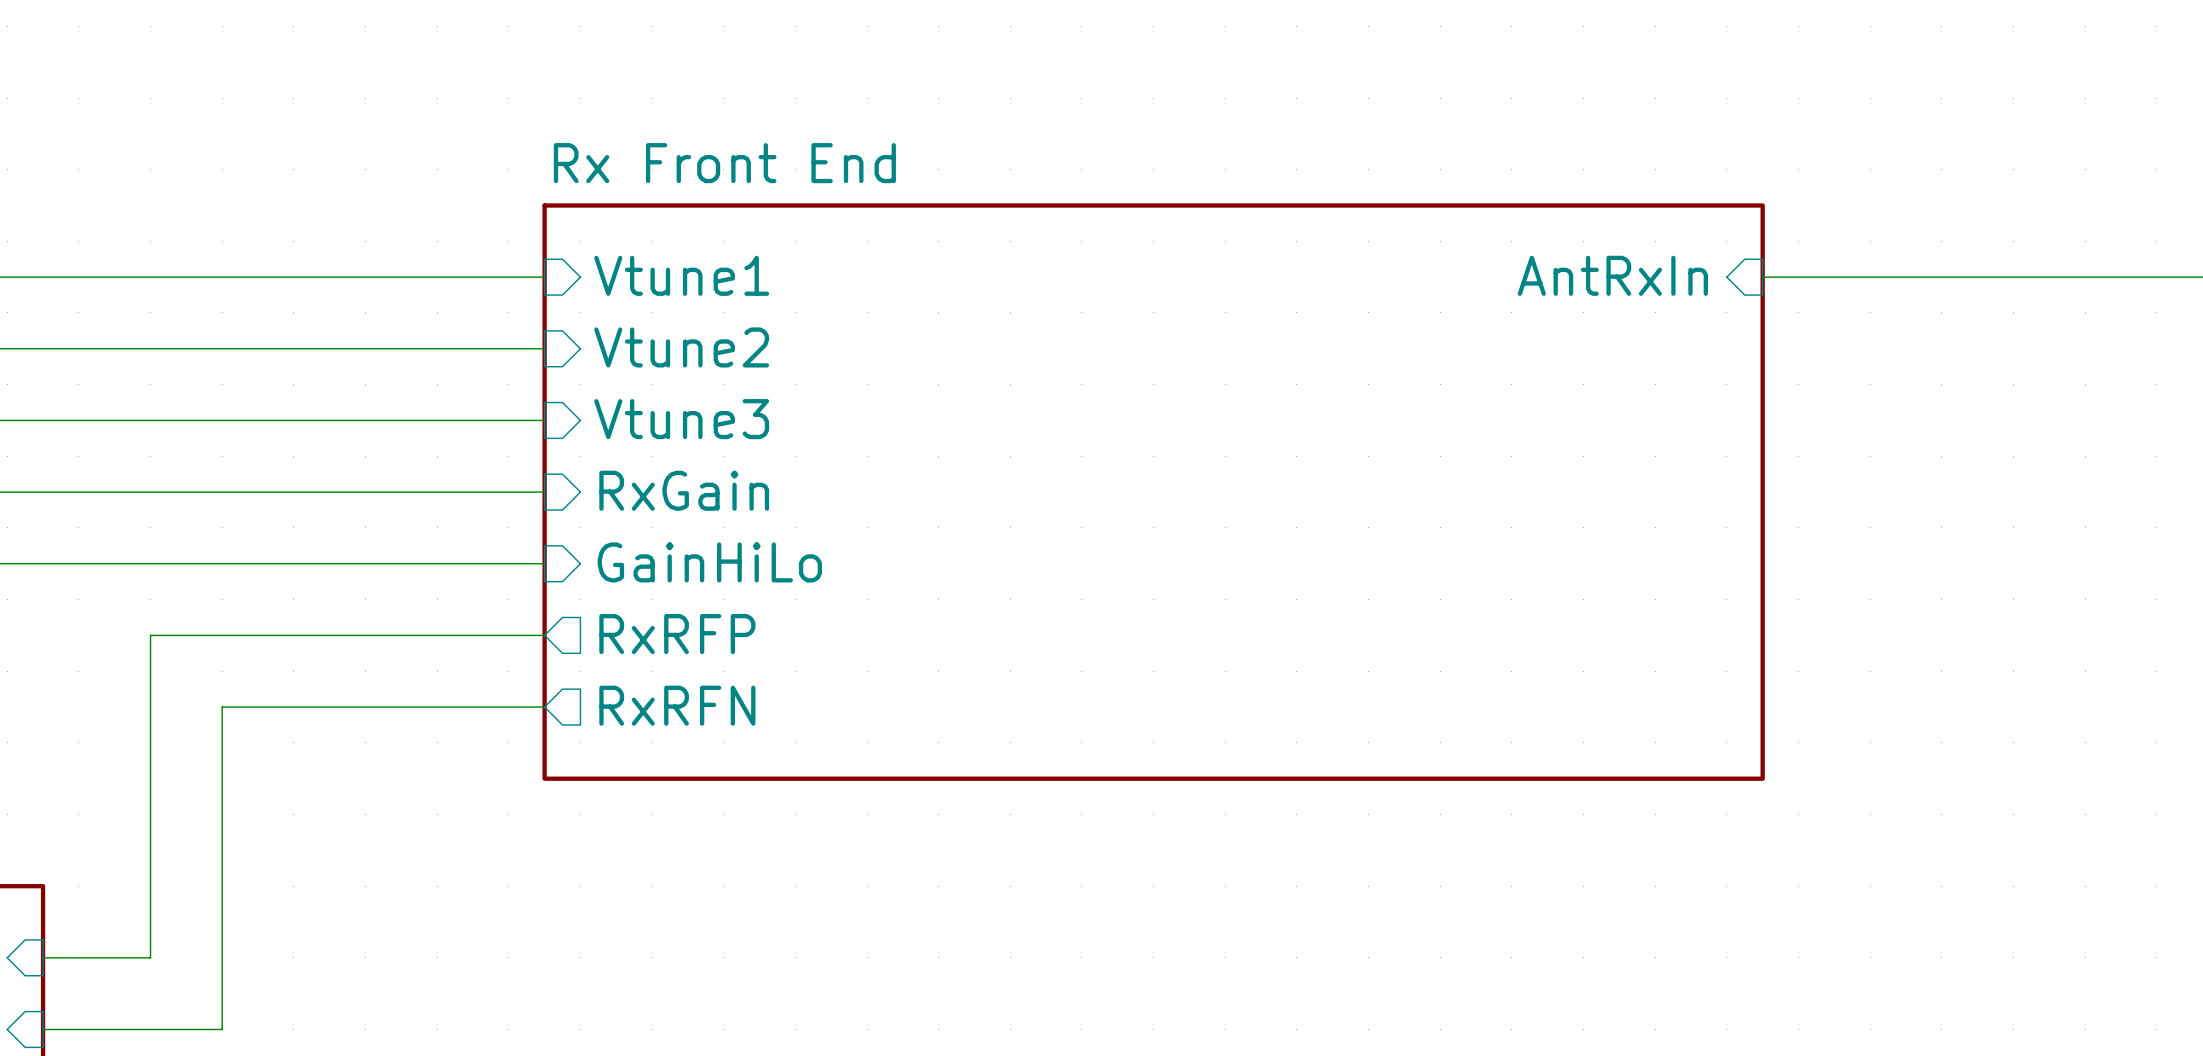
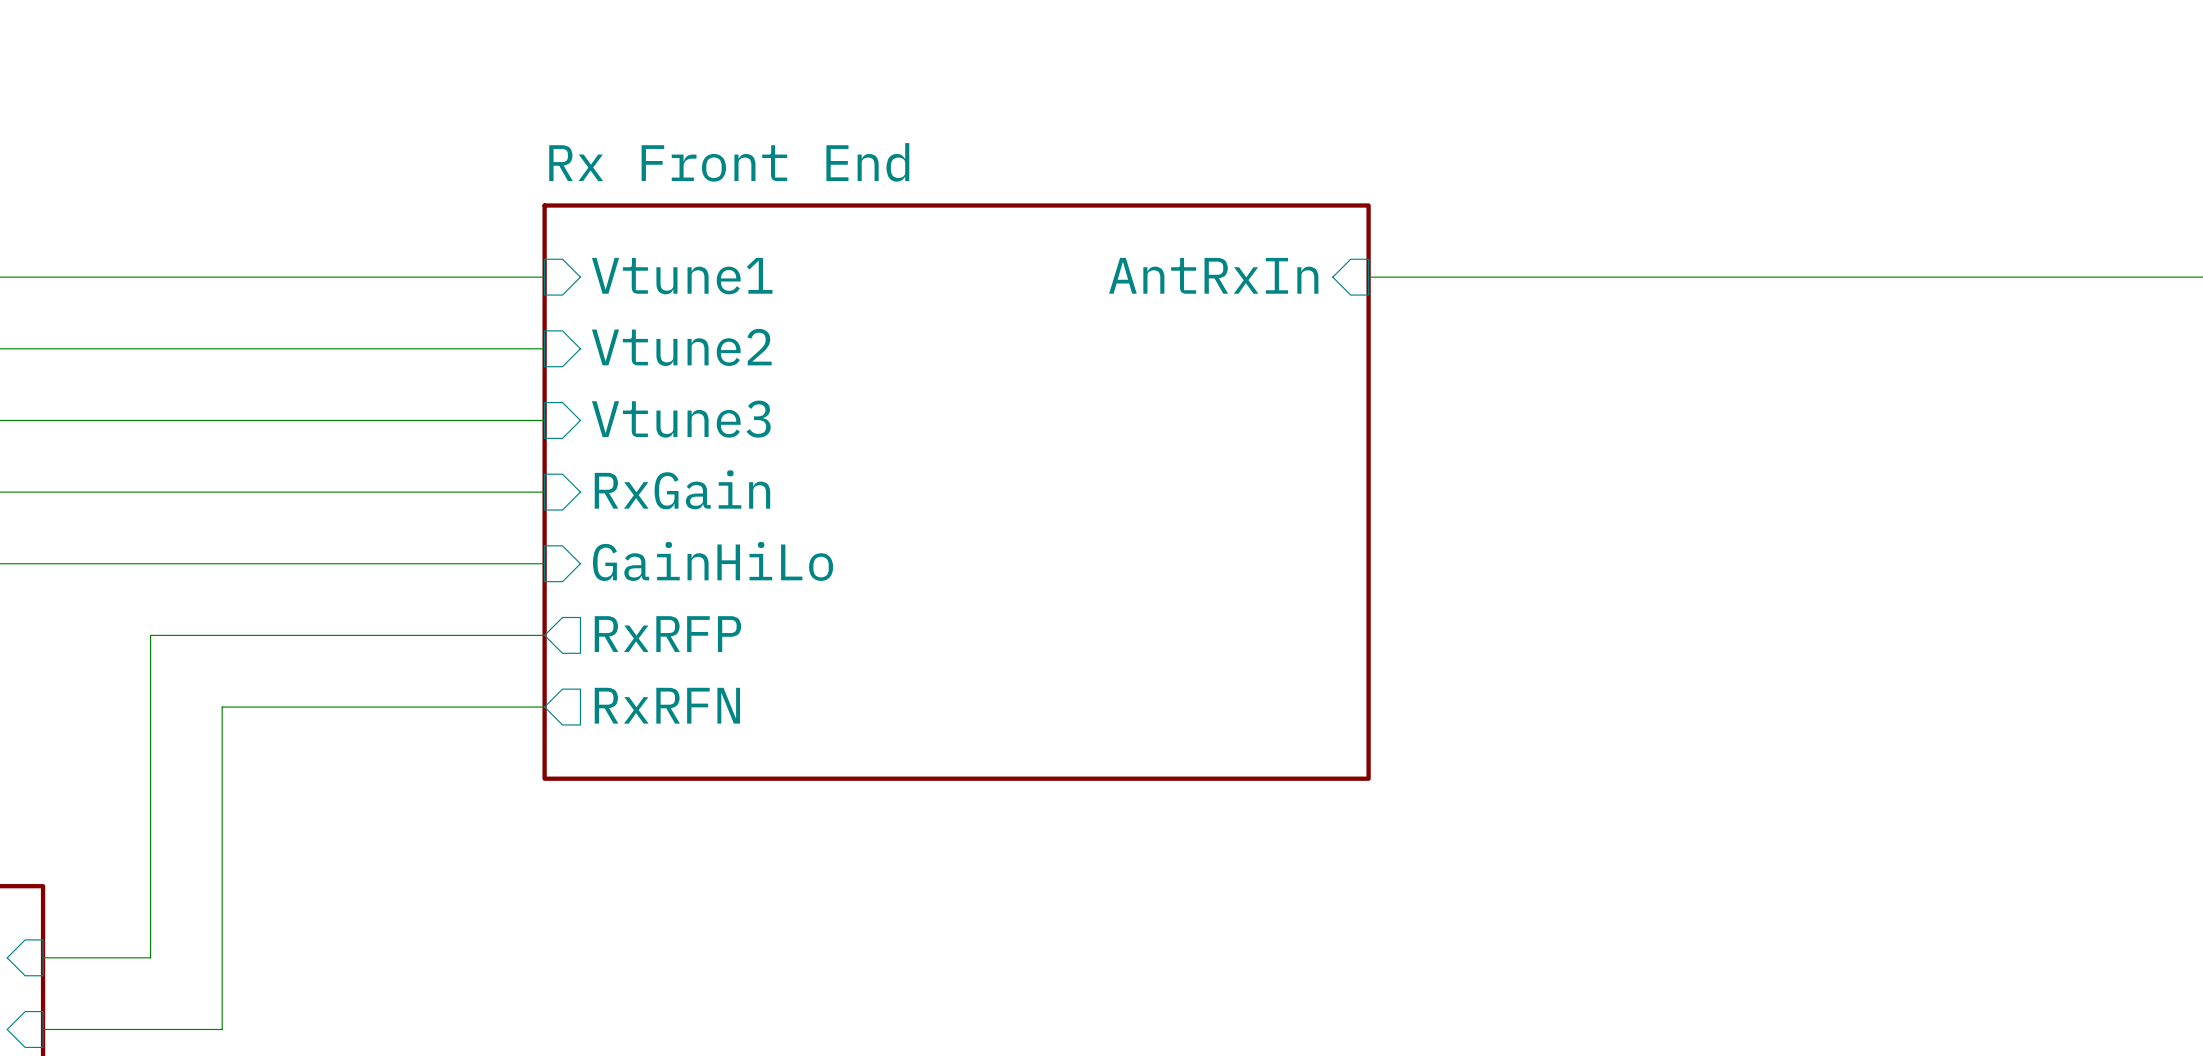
sheet pin position: AntRxIn (1612, 275) -> AntRxIn (1213, 275)
wire: none -> (1368, 277) (1762, 277)
sheet Rx Front End: none -> (956, 492)
sheet Rx Front End: (1153, 492) -> none

